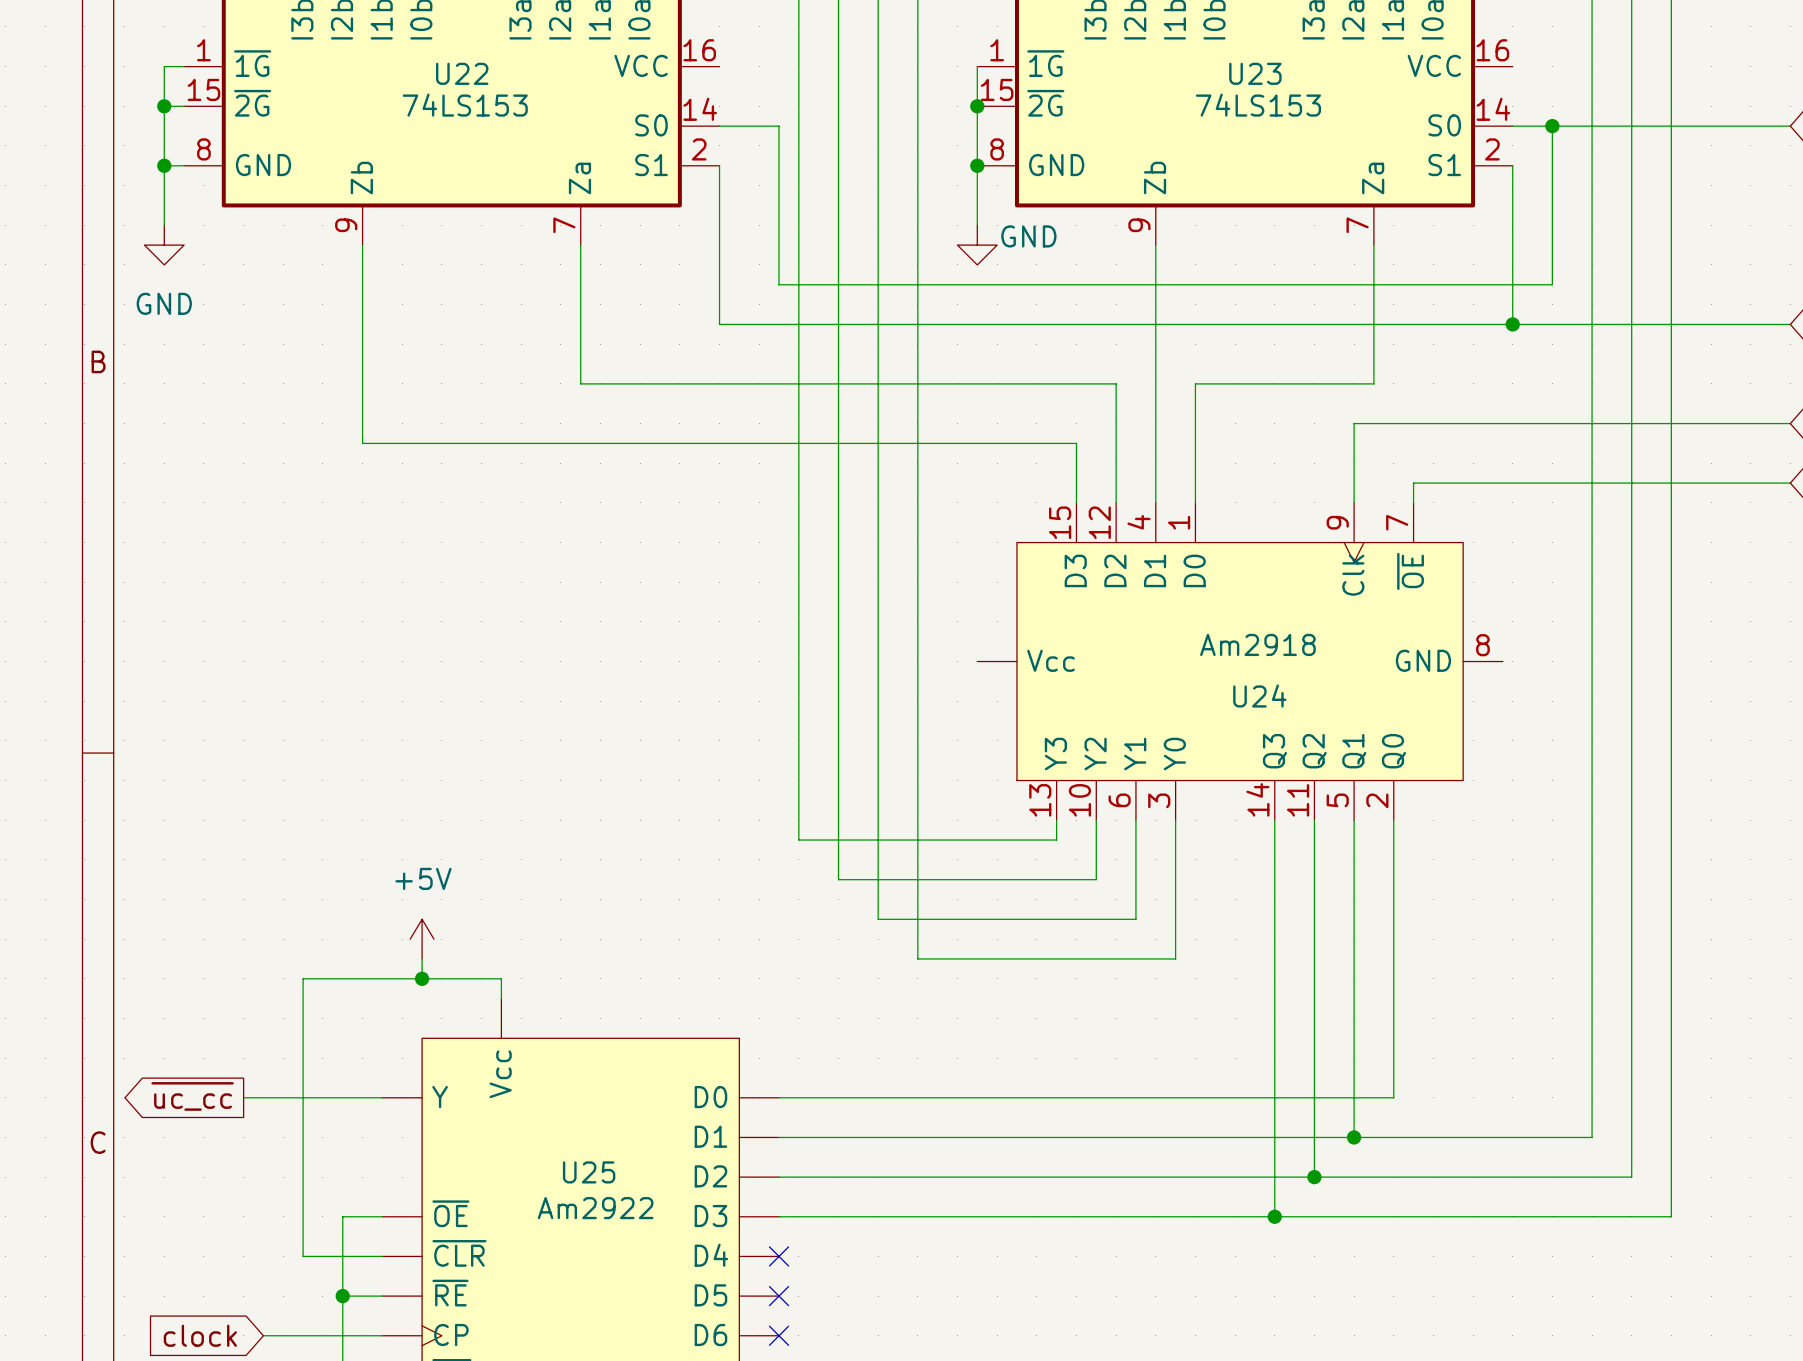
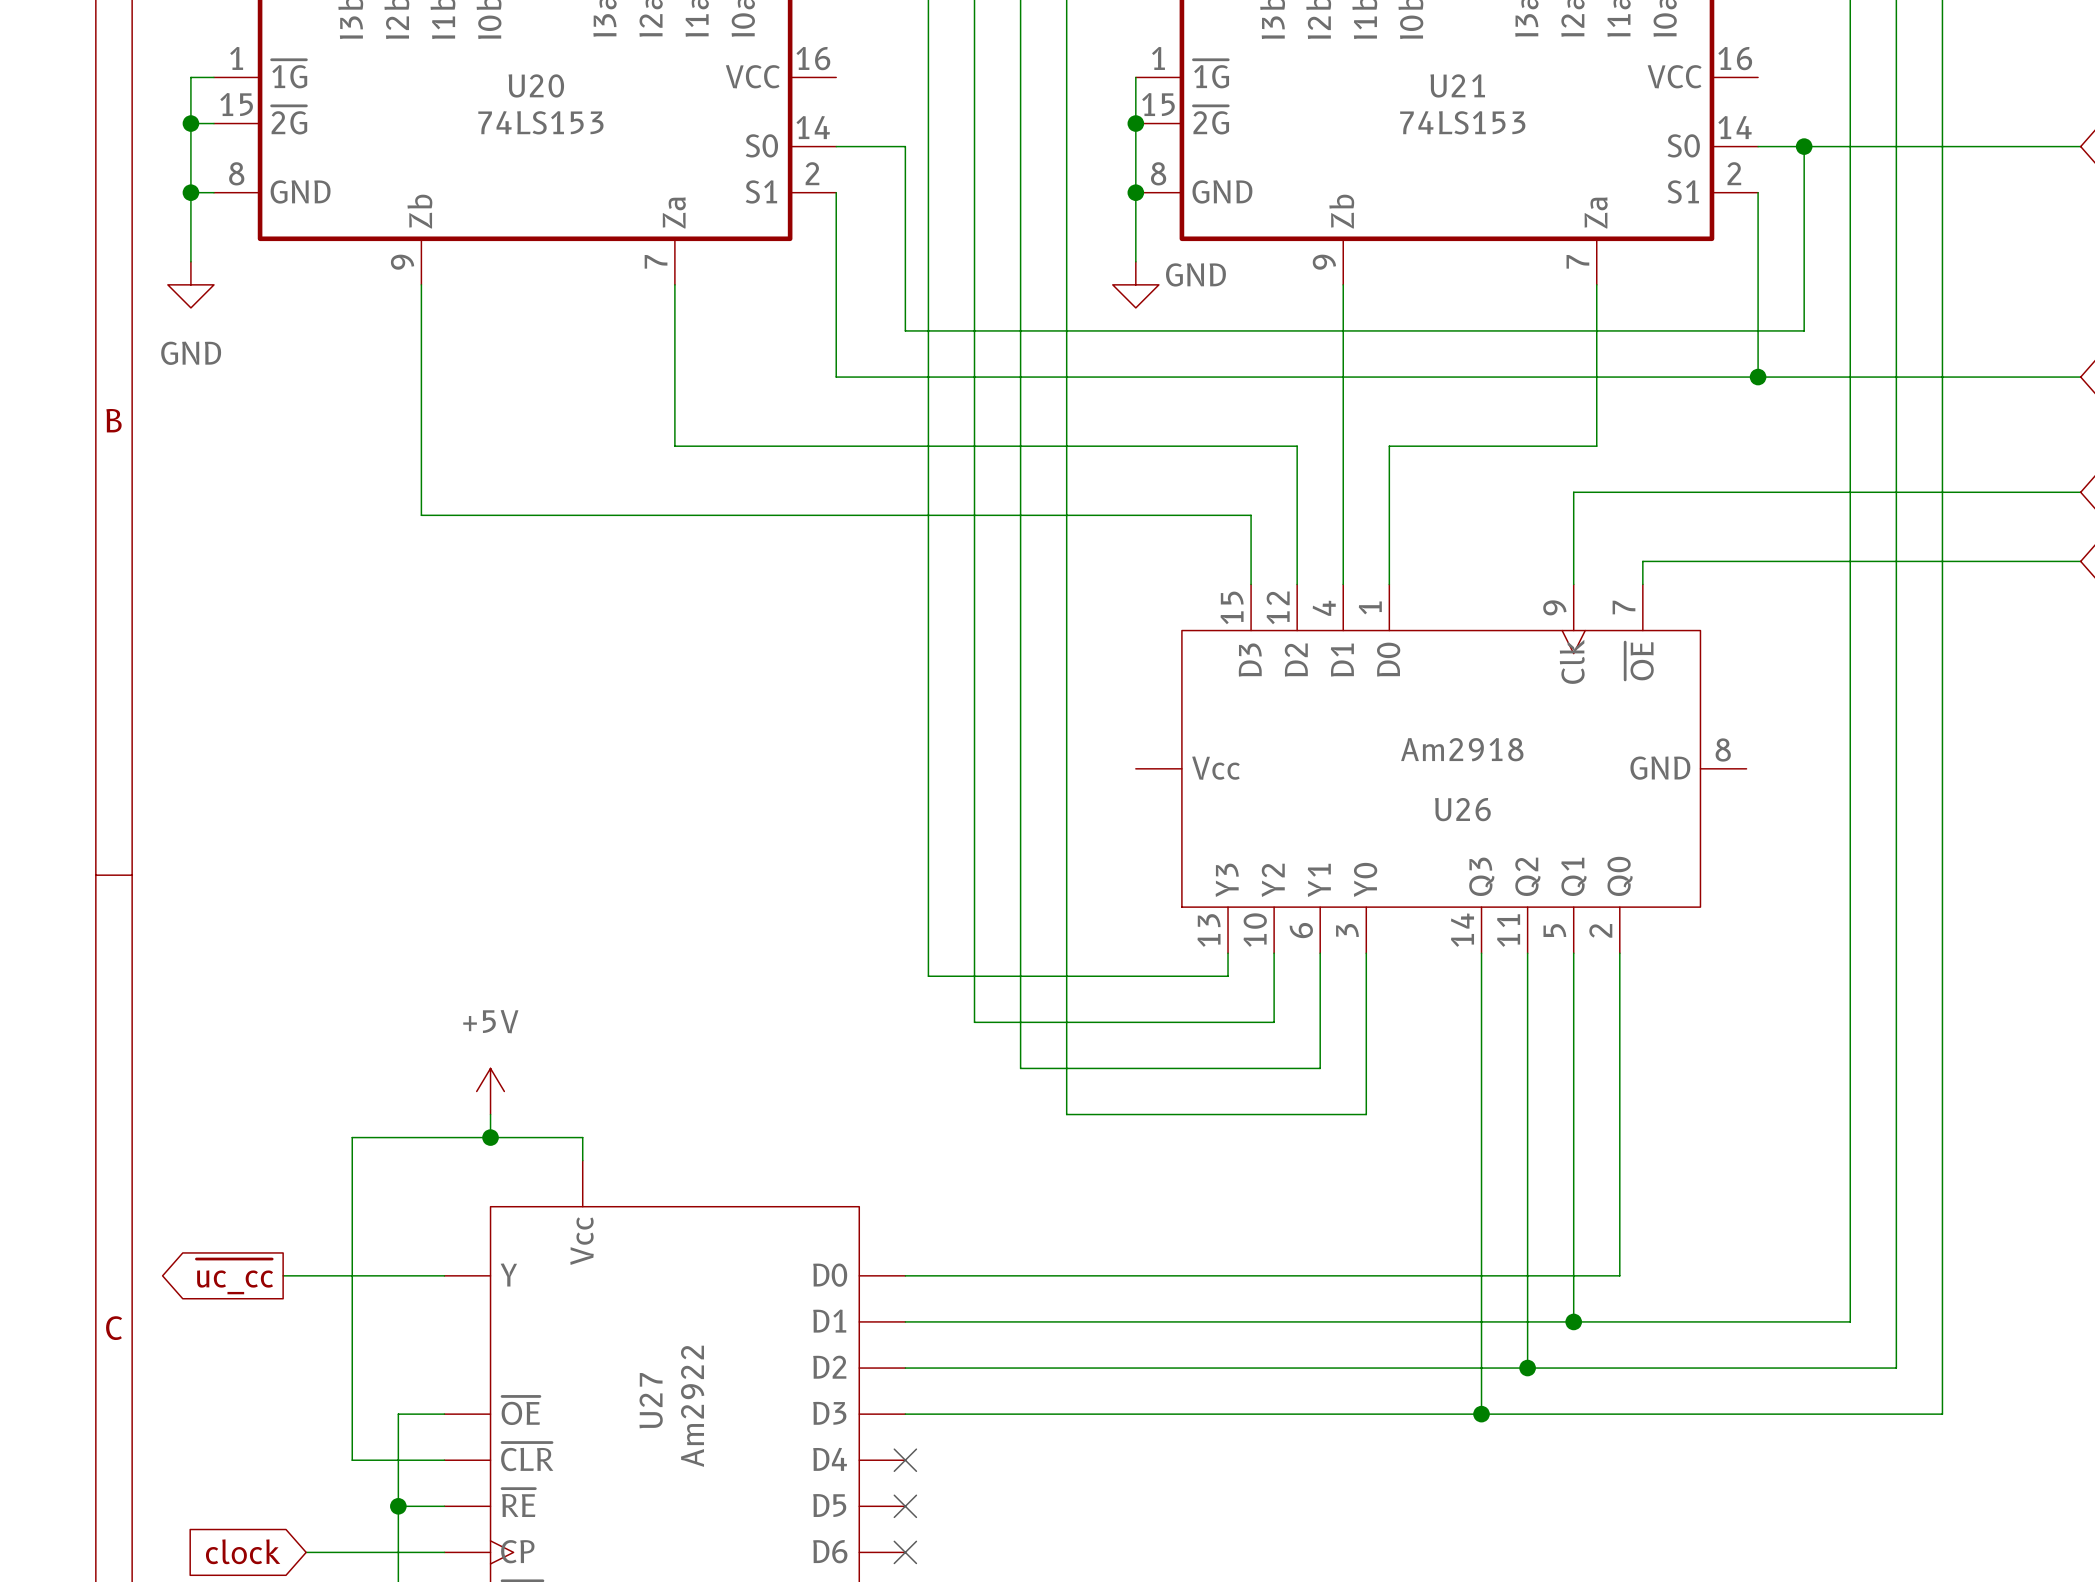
U22 name: U22 (462, 73) -> U20 (536, 85)
U23 name: U23 (1255, 73) -> U21 (1457, 85)
U24 name: U24 (1259, 696) -> U26 (1462, 809)
U25 name: U25 (589, 1172) -> U27 (651, 1400)
U25 value rotation: 0° (595, 1208) -> 90° counterclockwise (692, 1406)

